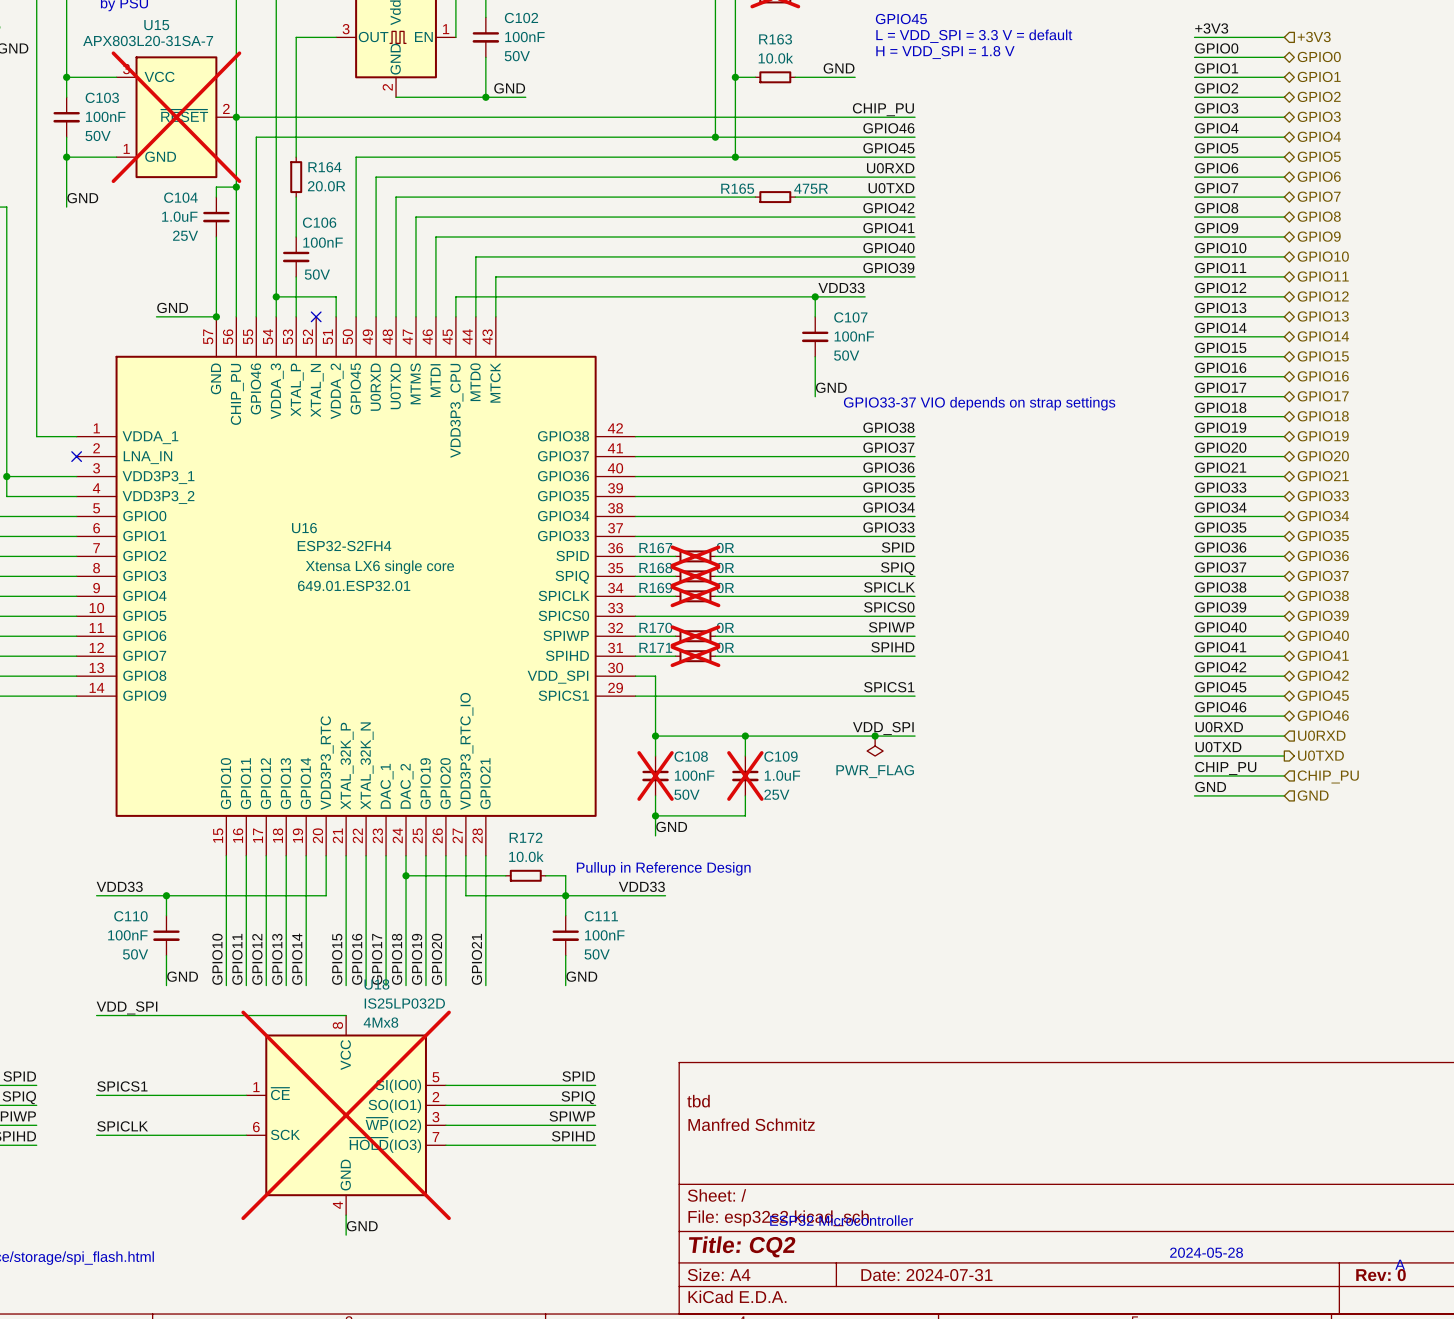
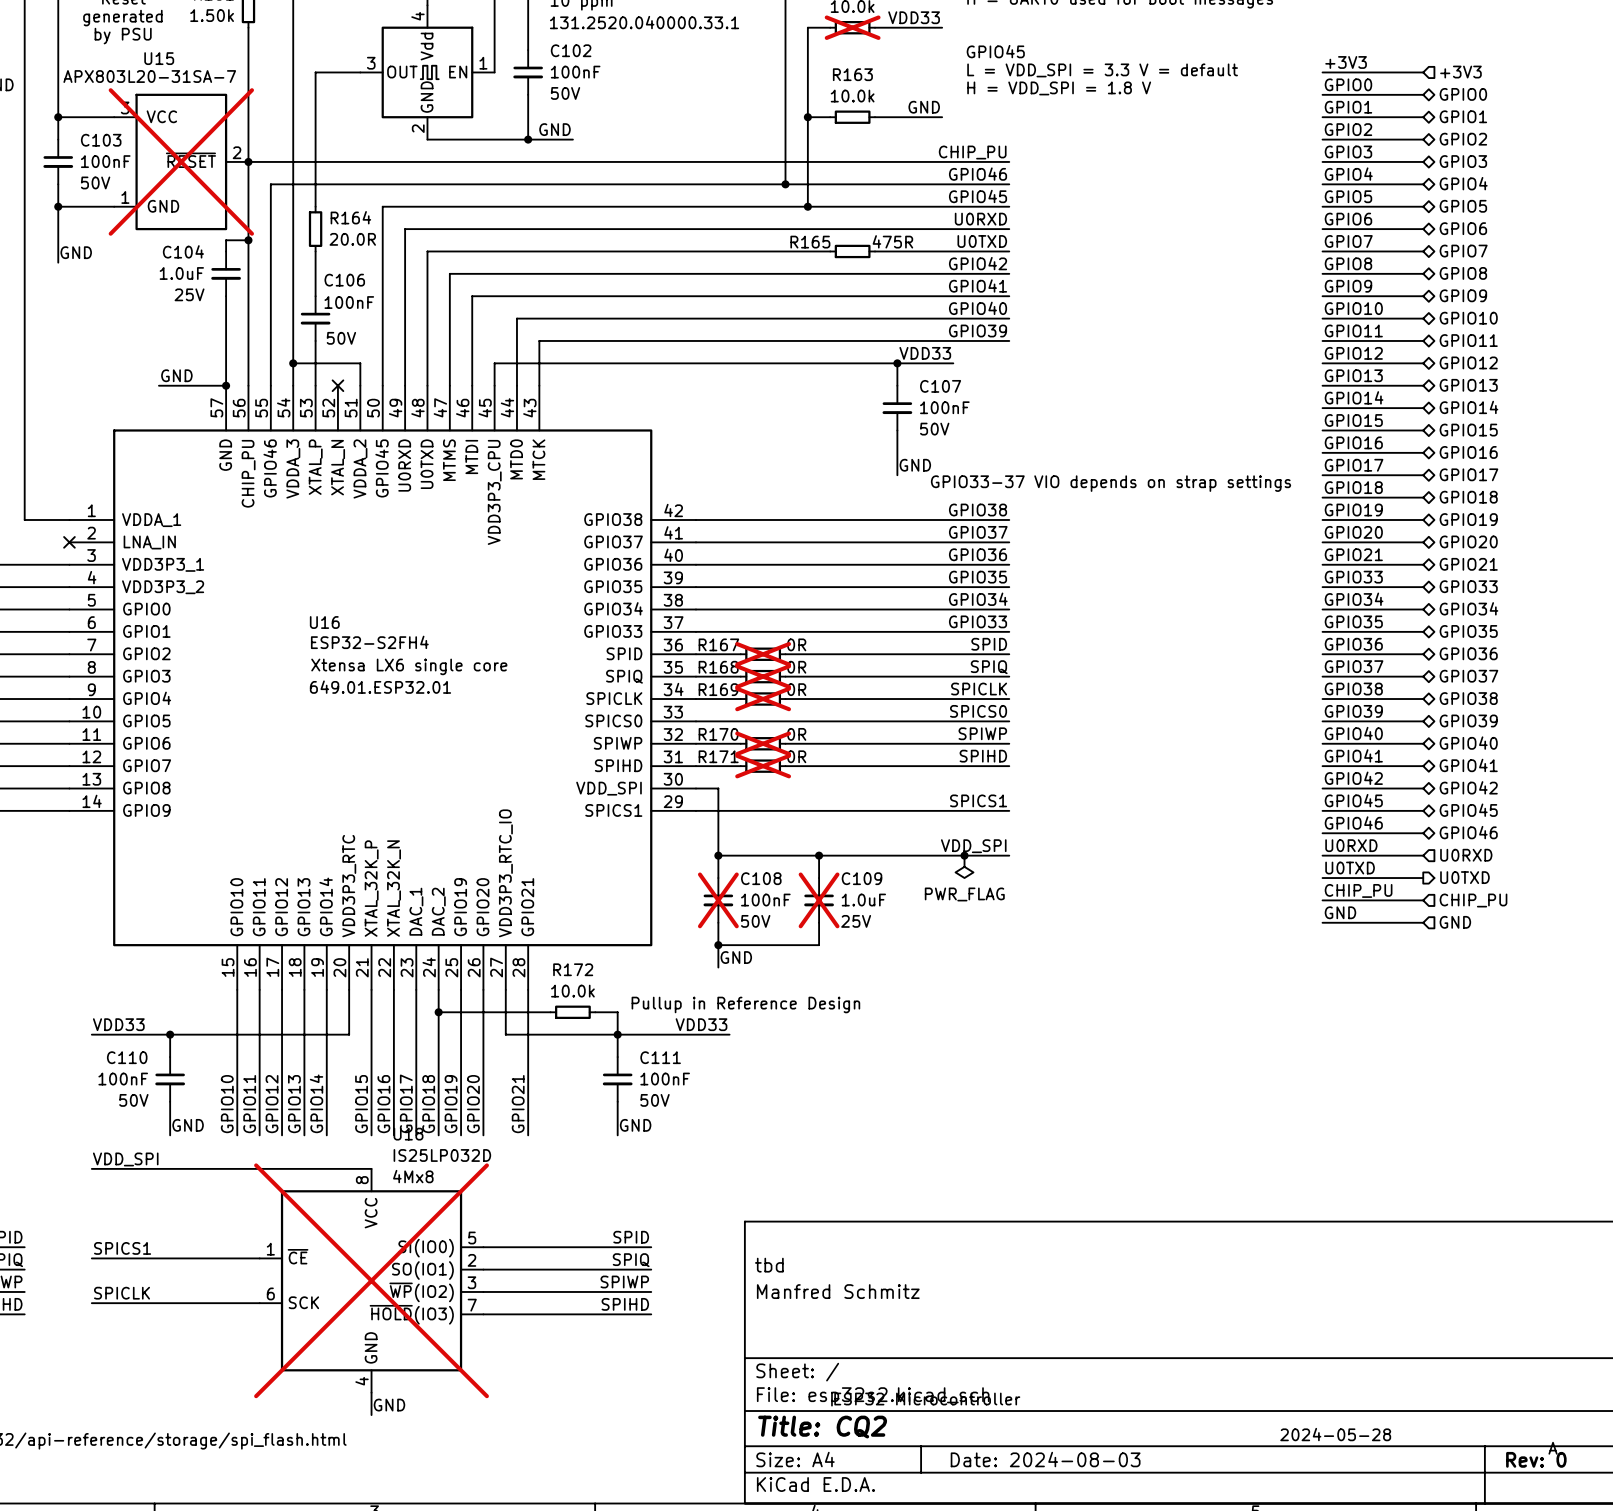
title block: Date: 2024-07-31 (926, 1275) -> Date: 2024-08-03 (1045, 1459)

